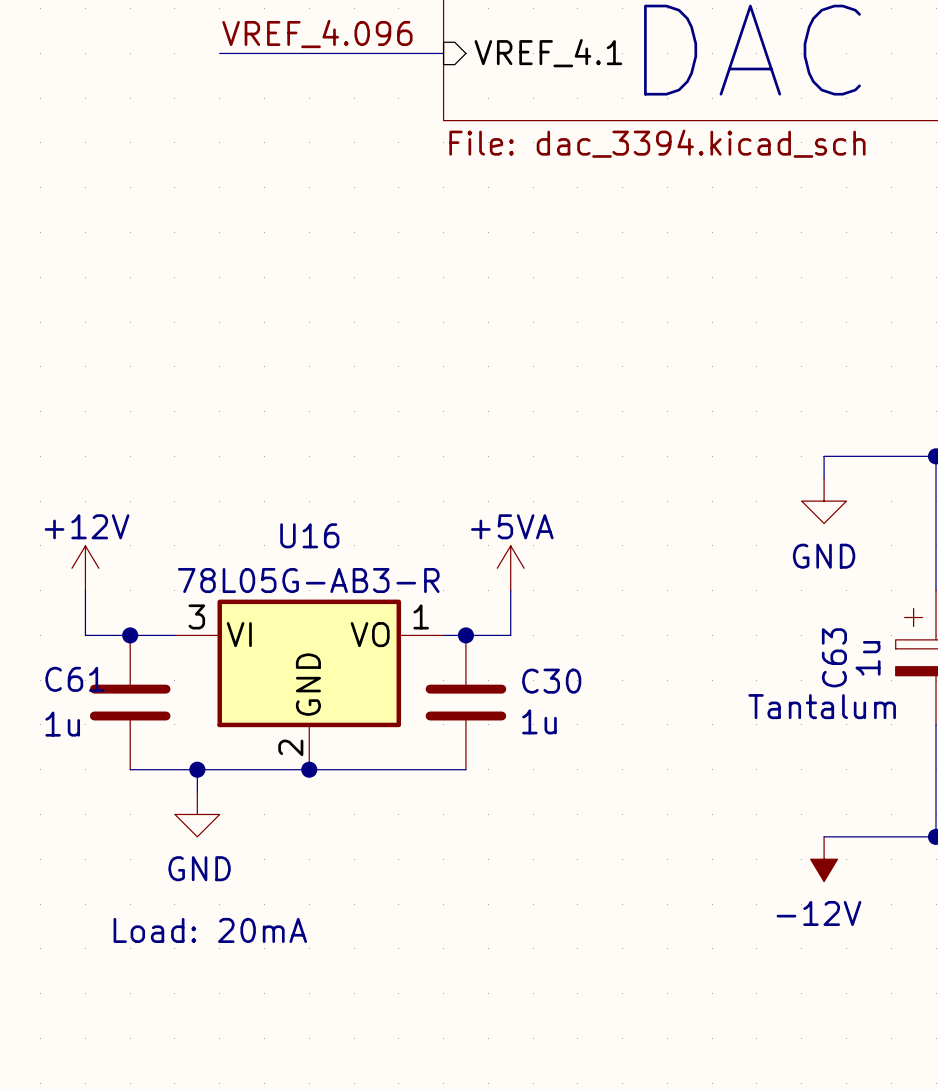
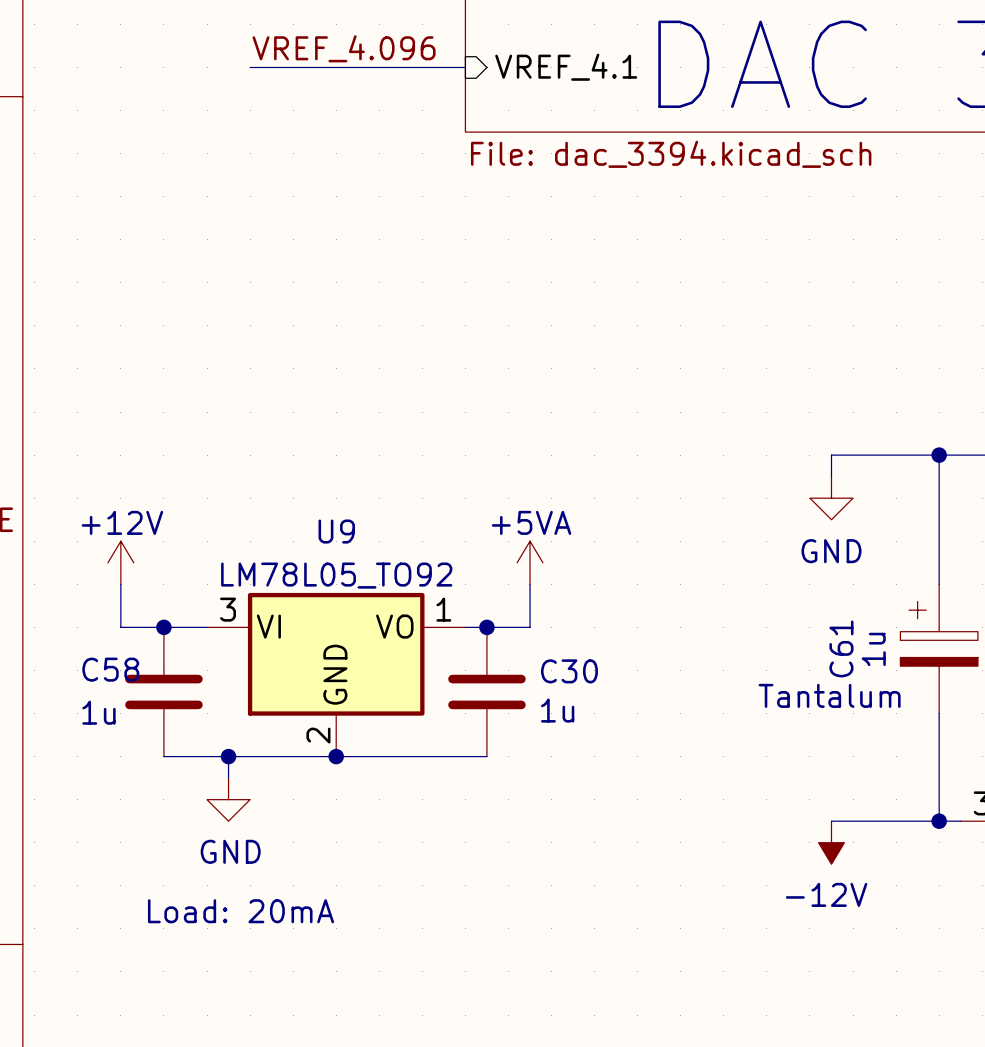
U16 name: U16 (309, 535) -> U9 (336, 531)
U16 value: 78L05G-AB3-R (308, 580) -> LM78L05_TO92 (336, 575)
C63 name: C63 (834, 657) -> C61 (841, 648)
C61 name: C61 (74, 679) -> C58 (110, 669)

